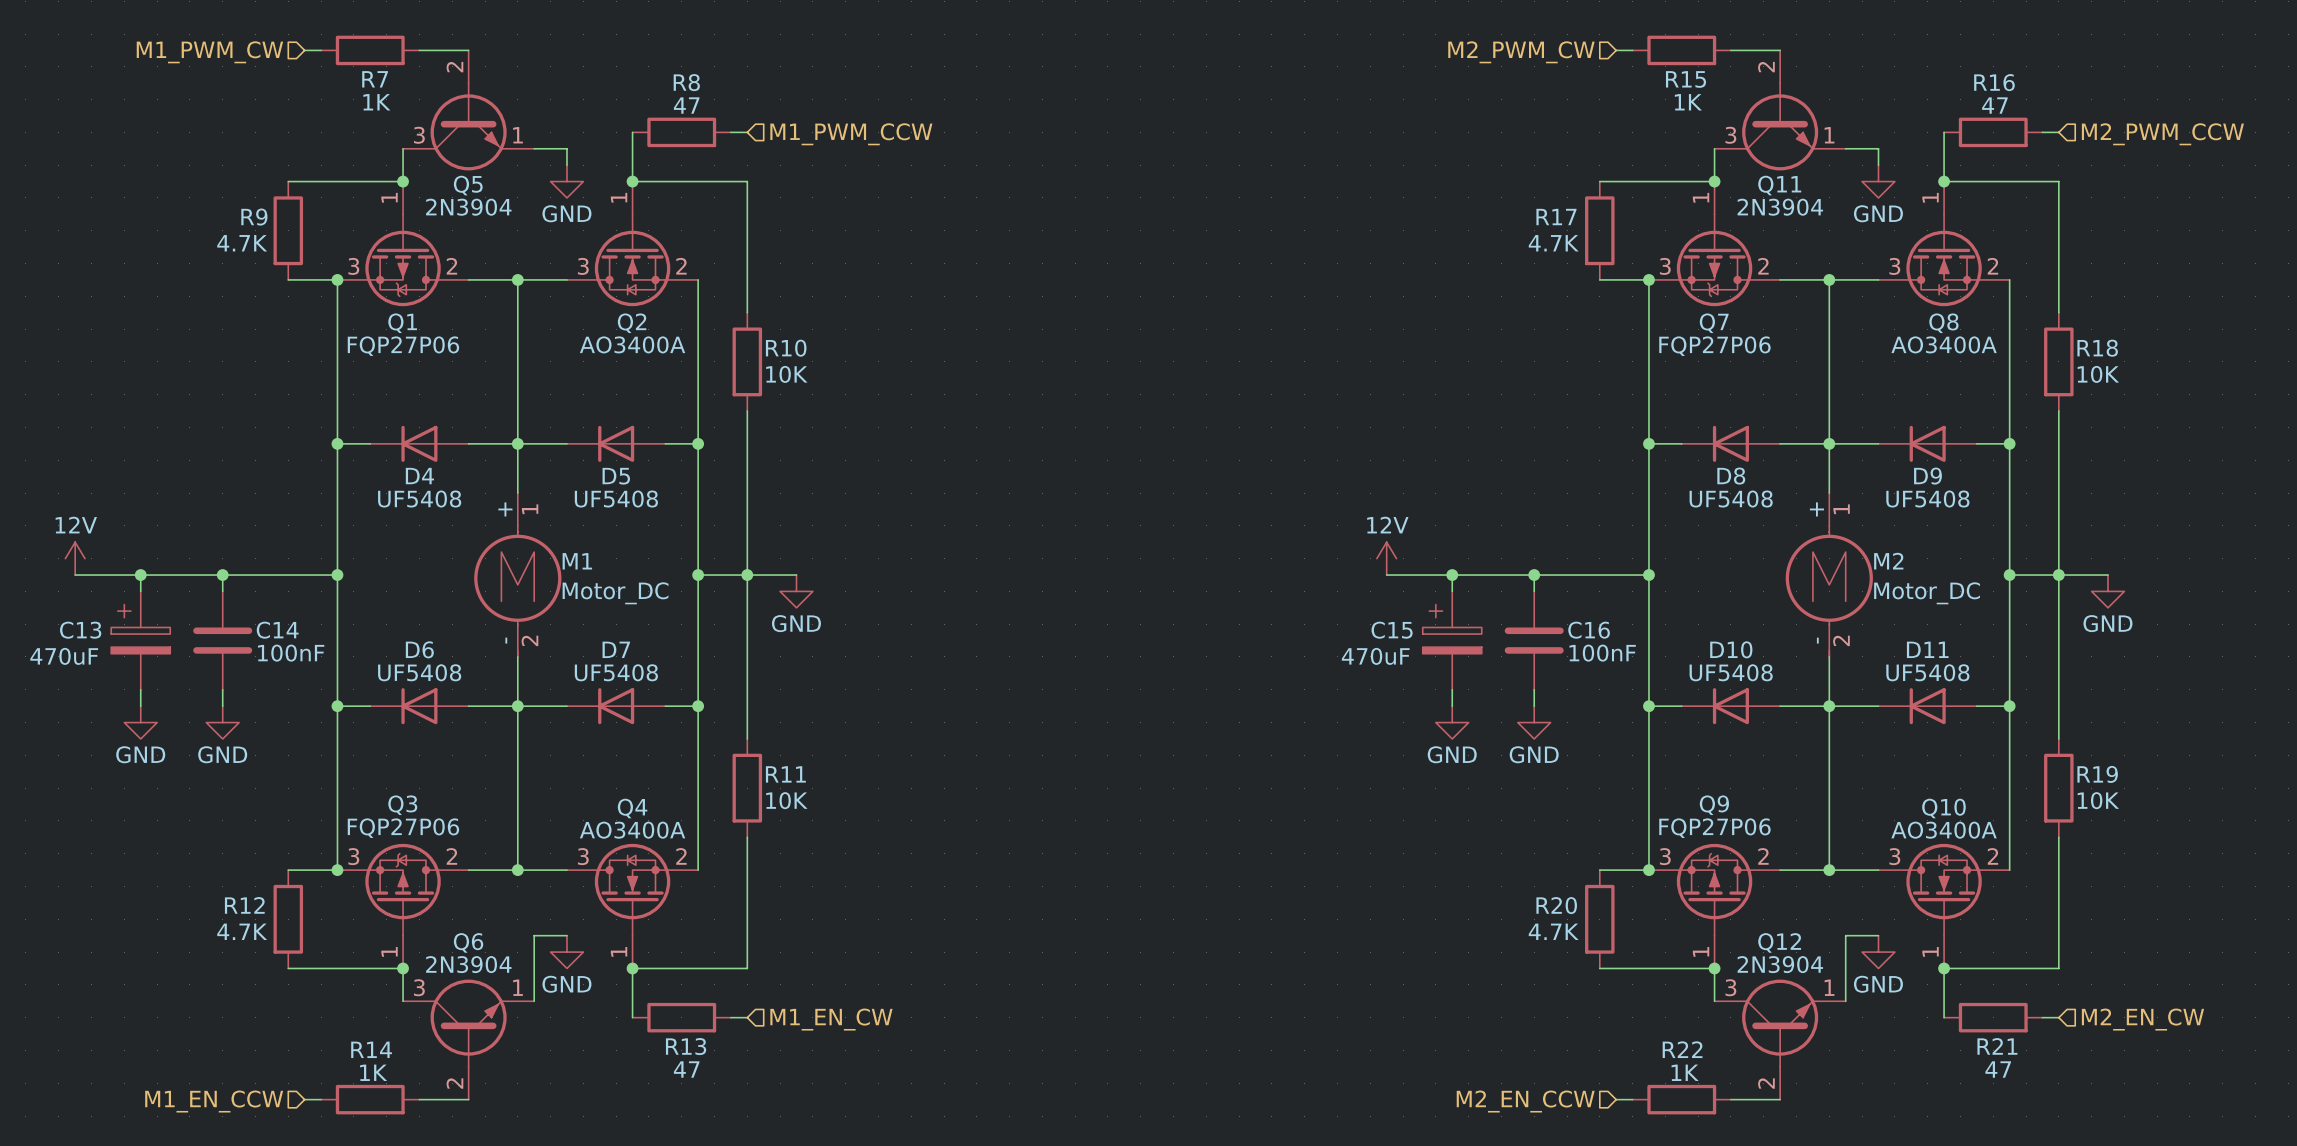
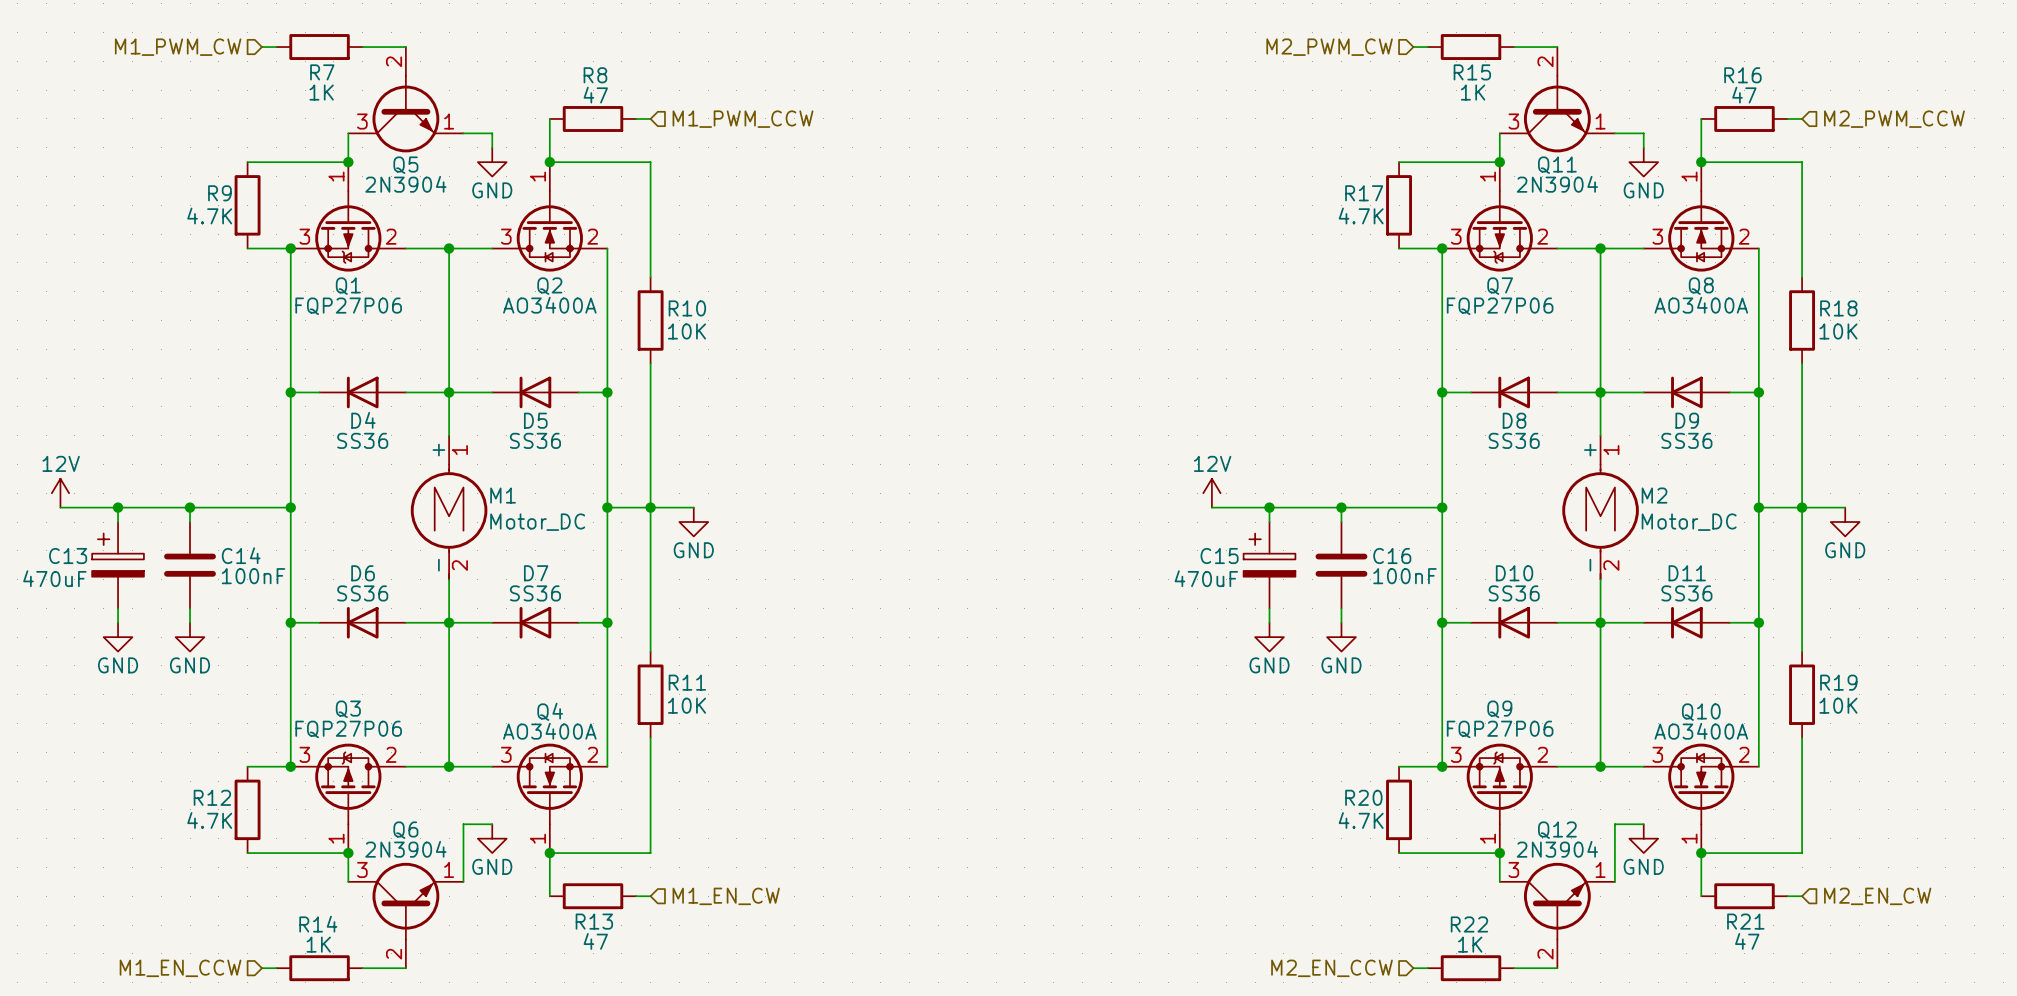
D4 value: UF5408 (419, 499) -> SS36 (362, 440)
D5 value: UF5408 (616, 499) -> SS36 (535, 440)
D8 value: UF5408 (1731, 499) -> SS36 (1514, 440)
D9 value: UF5408 (1927, 499) -> SS36 (1686, 440)
D6 value: UF5408 (419, 672) -> SS36 (362, 593)
D7 value: UF5408 (616, 672) -> SS36 (535, 593)
D10 value: UF5408 (1731, 672) -> SS36 (1514, 593)
D11 value: UF5408 (1927, 672) -> SS36 (1686, 593)

